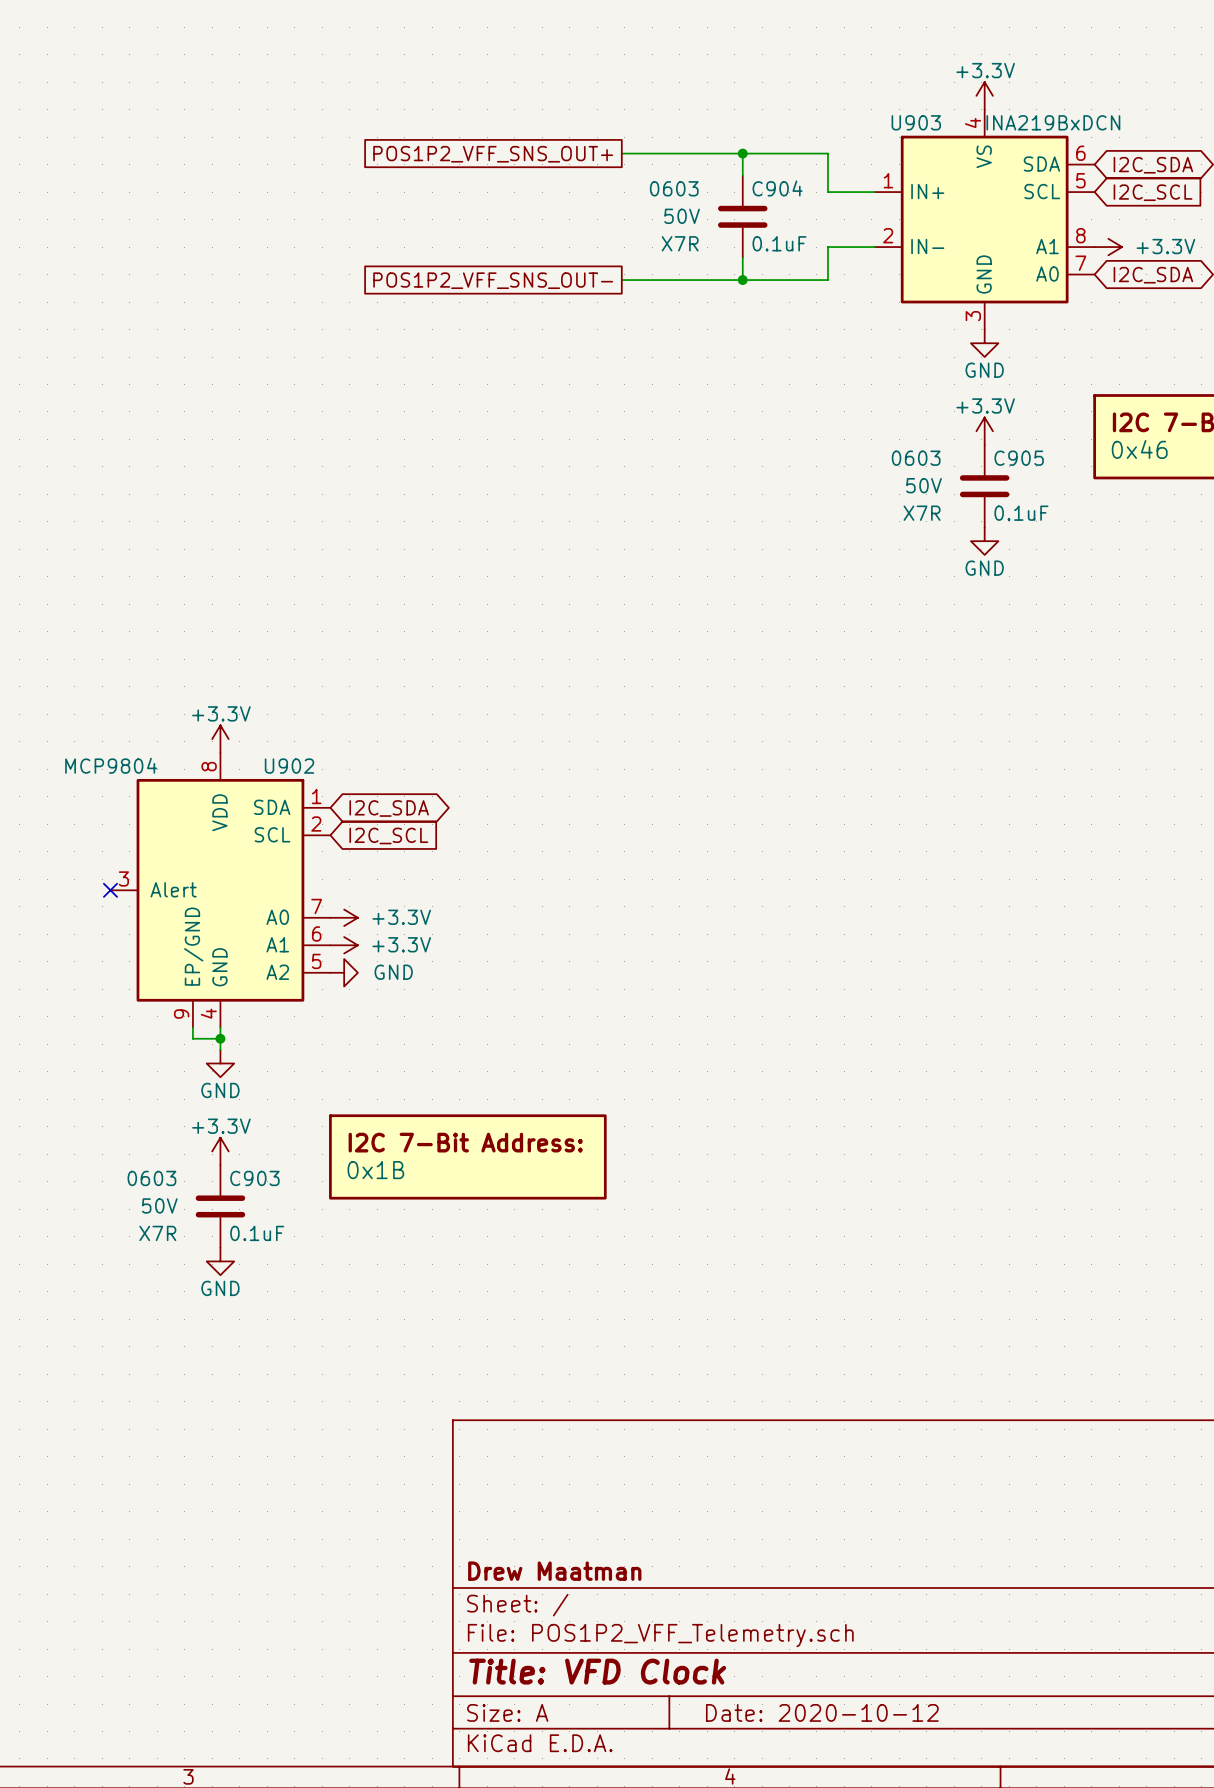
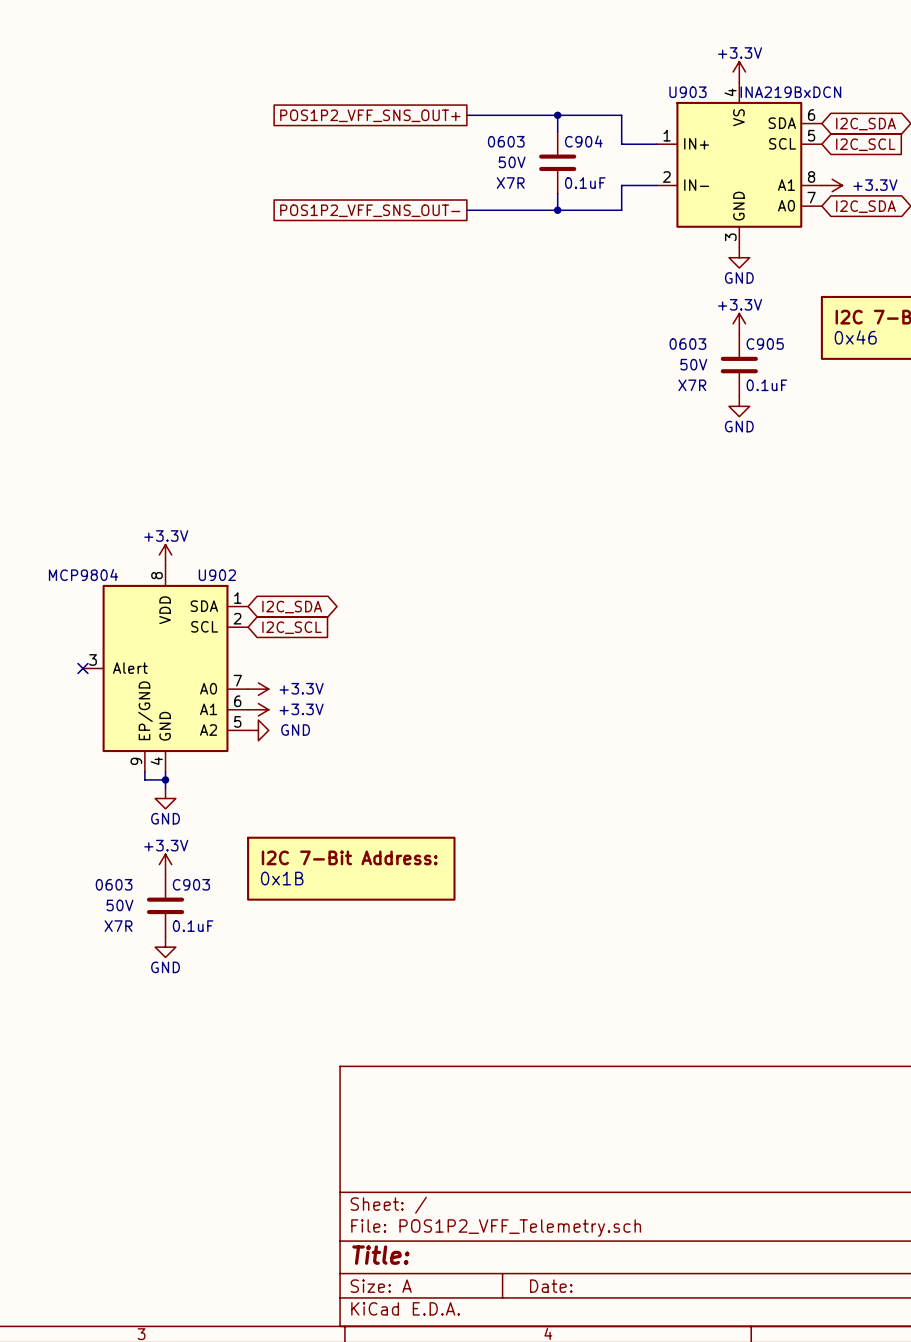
title block: Drew Maatman (554, 1571) -> none
title block: Title: VFD Clock (597, 1671) -> Title: (380, 1255)
title block: Date: 2020-10-12 (822, 1712) -> Date: (551, 1286)

